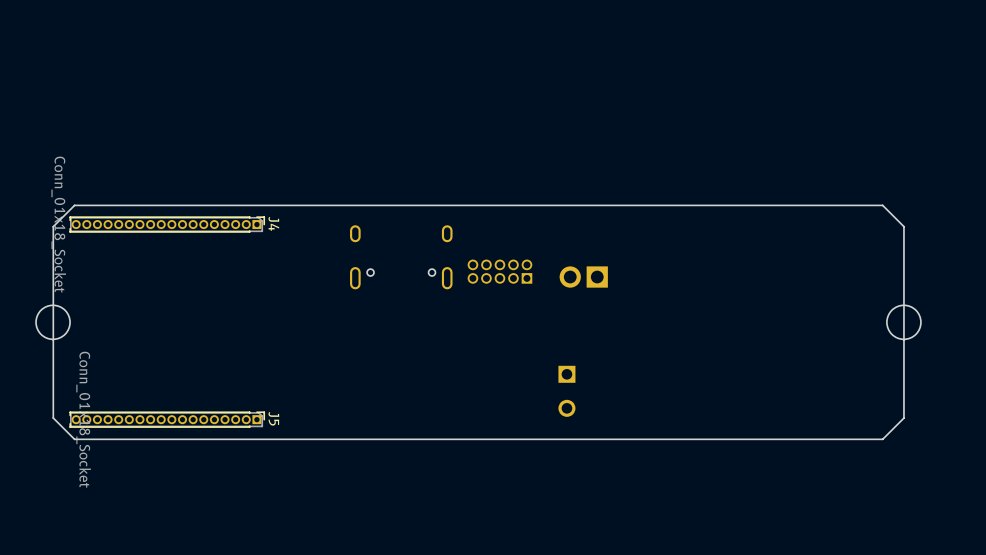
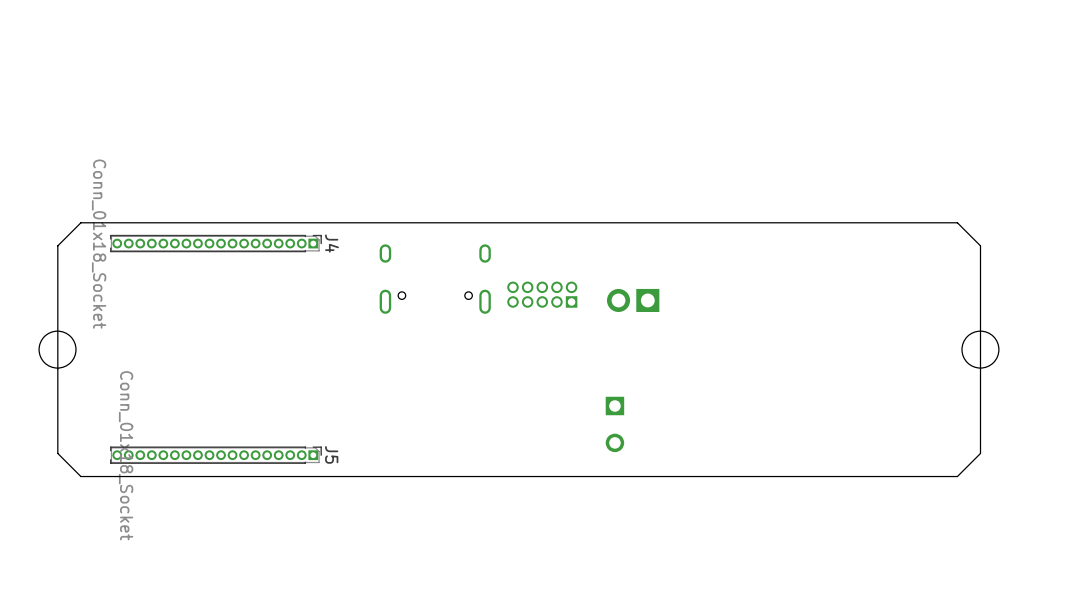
J4 position: (167, 224) -> (215, 243)
J5 position: (167, 419) -> (215, 455)

